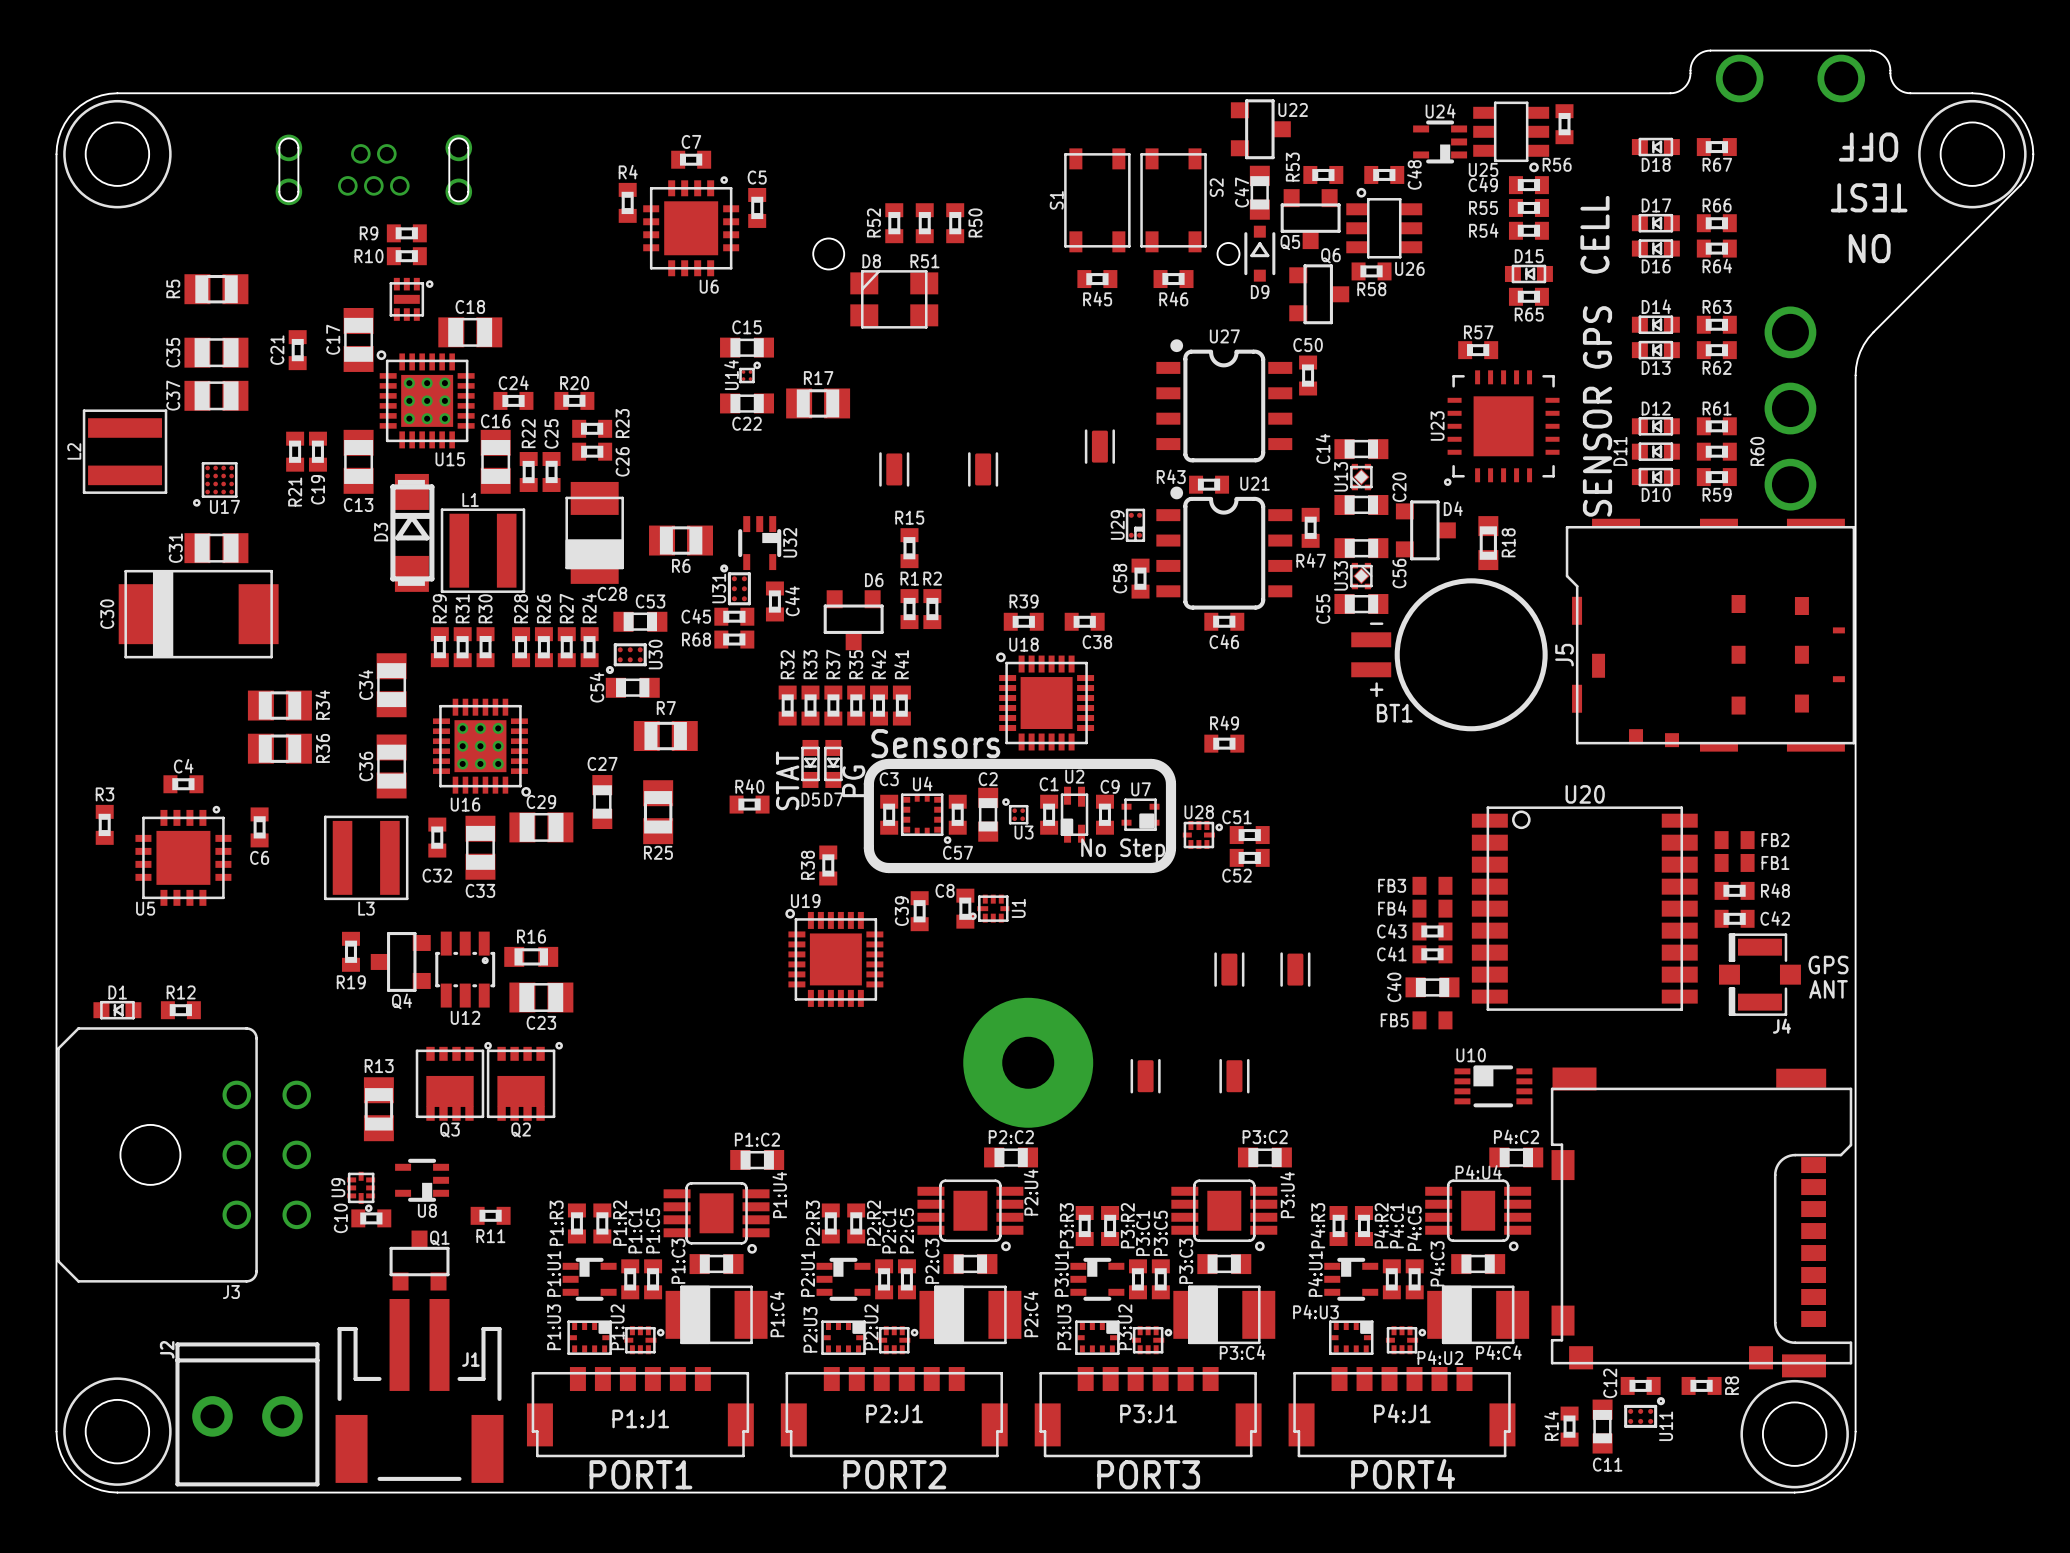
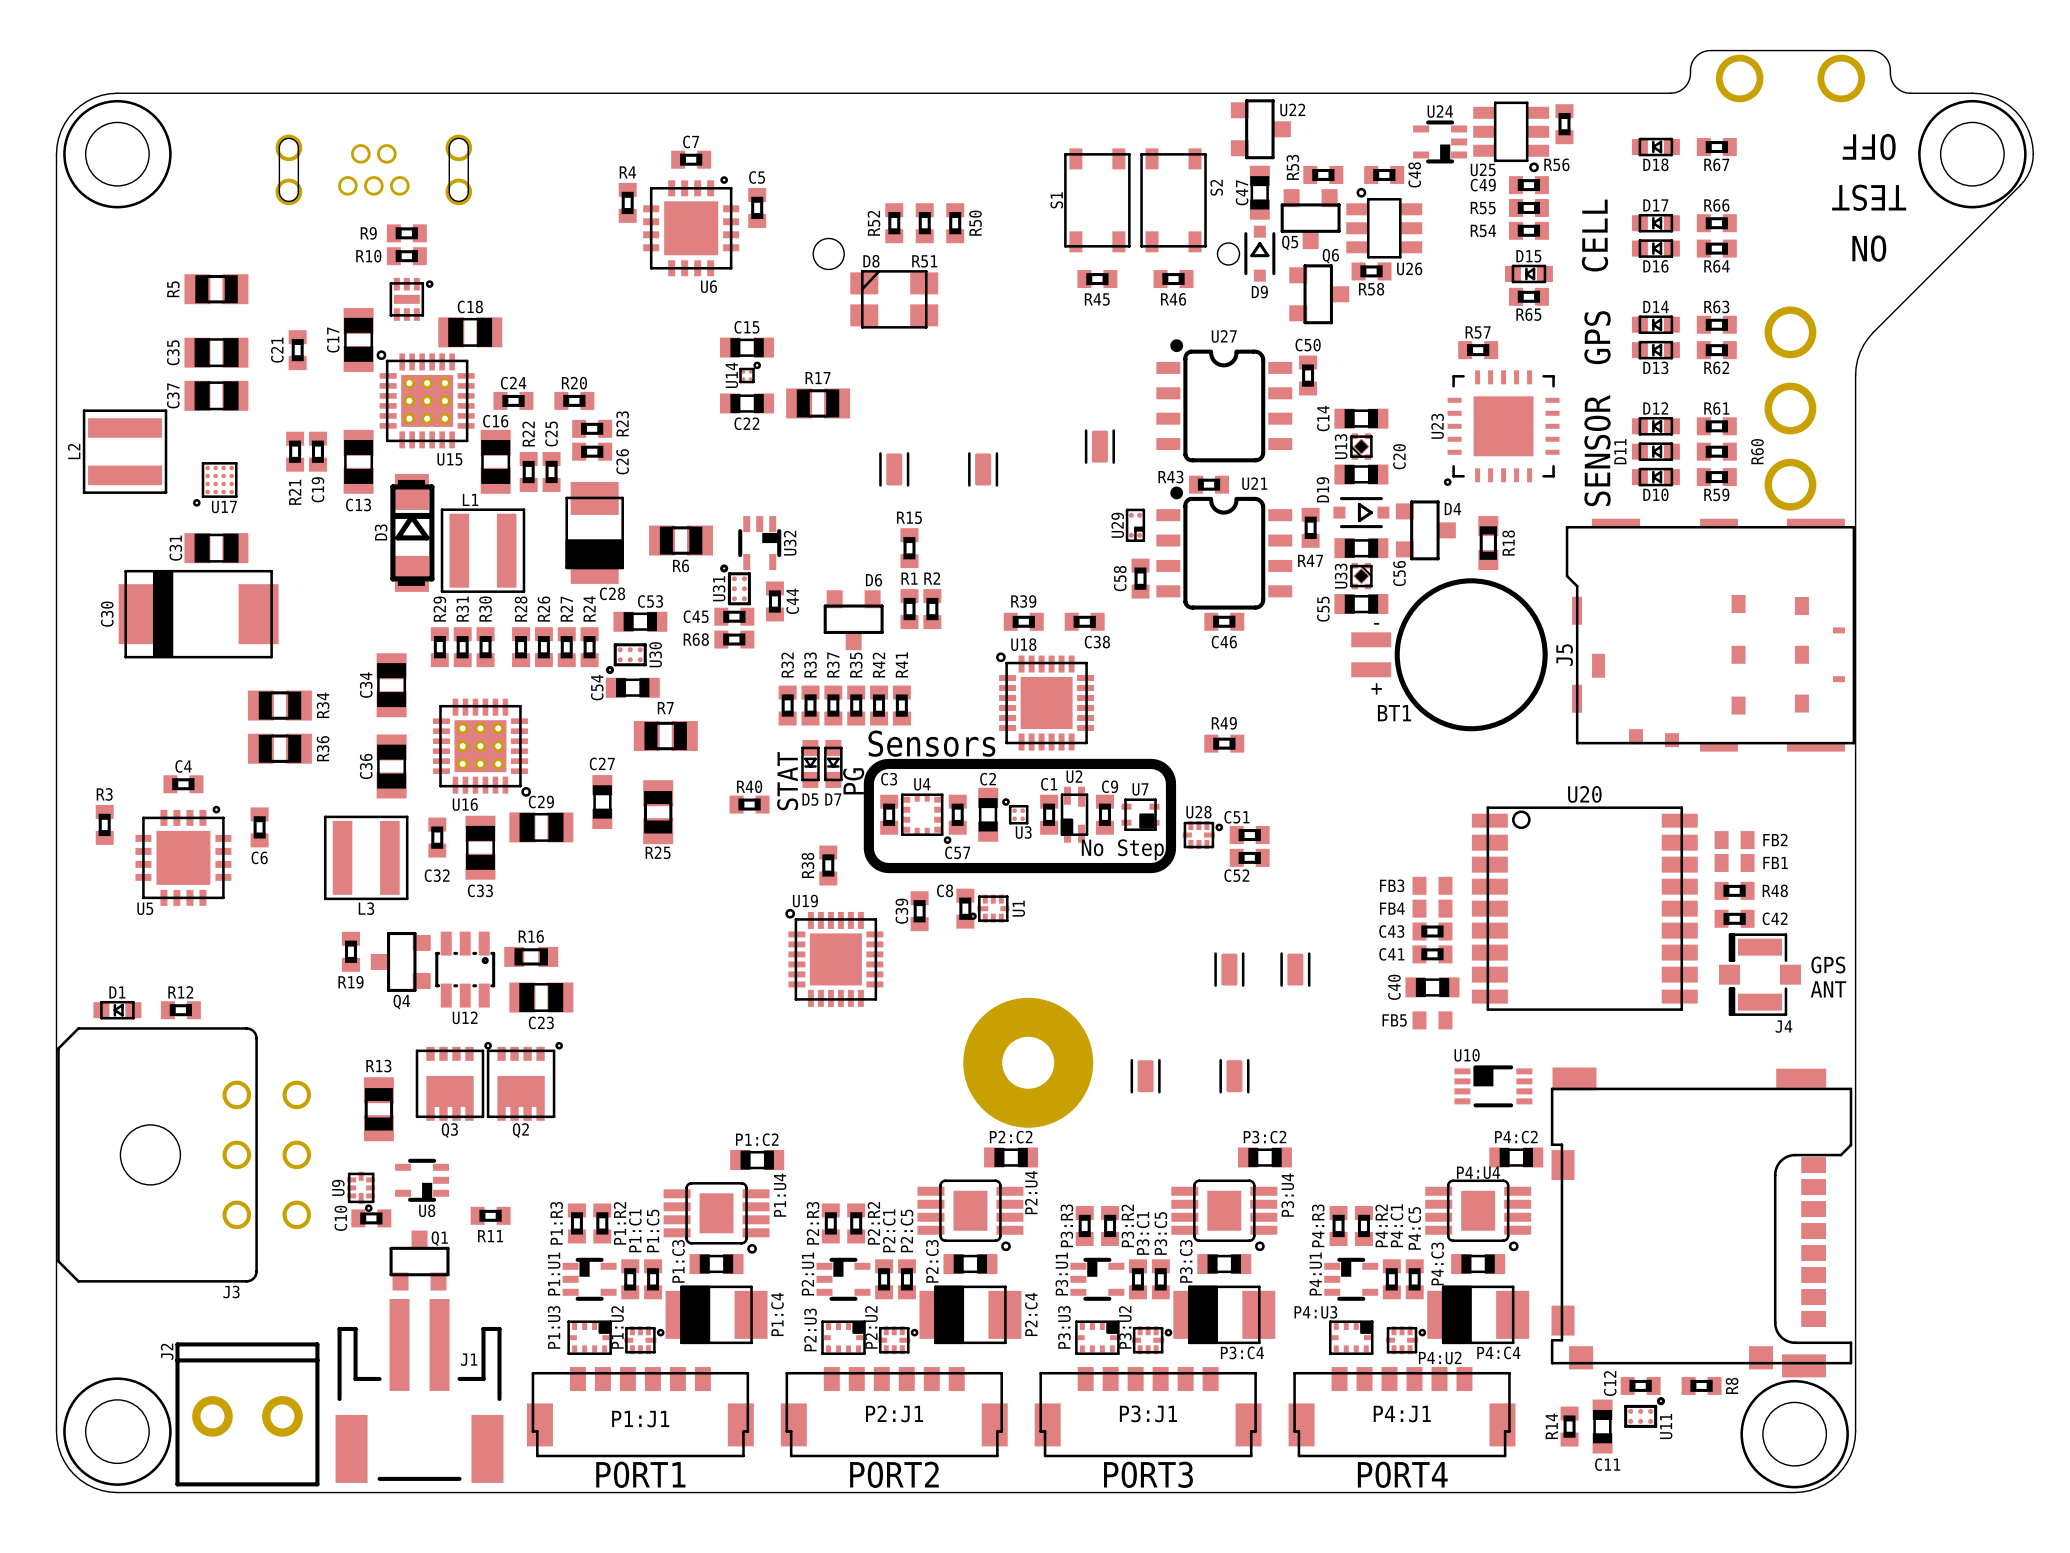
C14 position: (1361, 449) -> (1361, 418)
U13 position: (1361, 477) -> (1361, 446)
C20 position: (1361, 504) -> (1361, 474)
D19: none -> (1361, 512)

